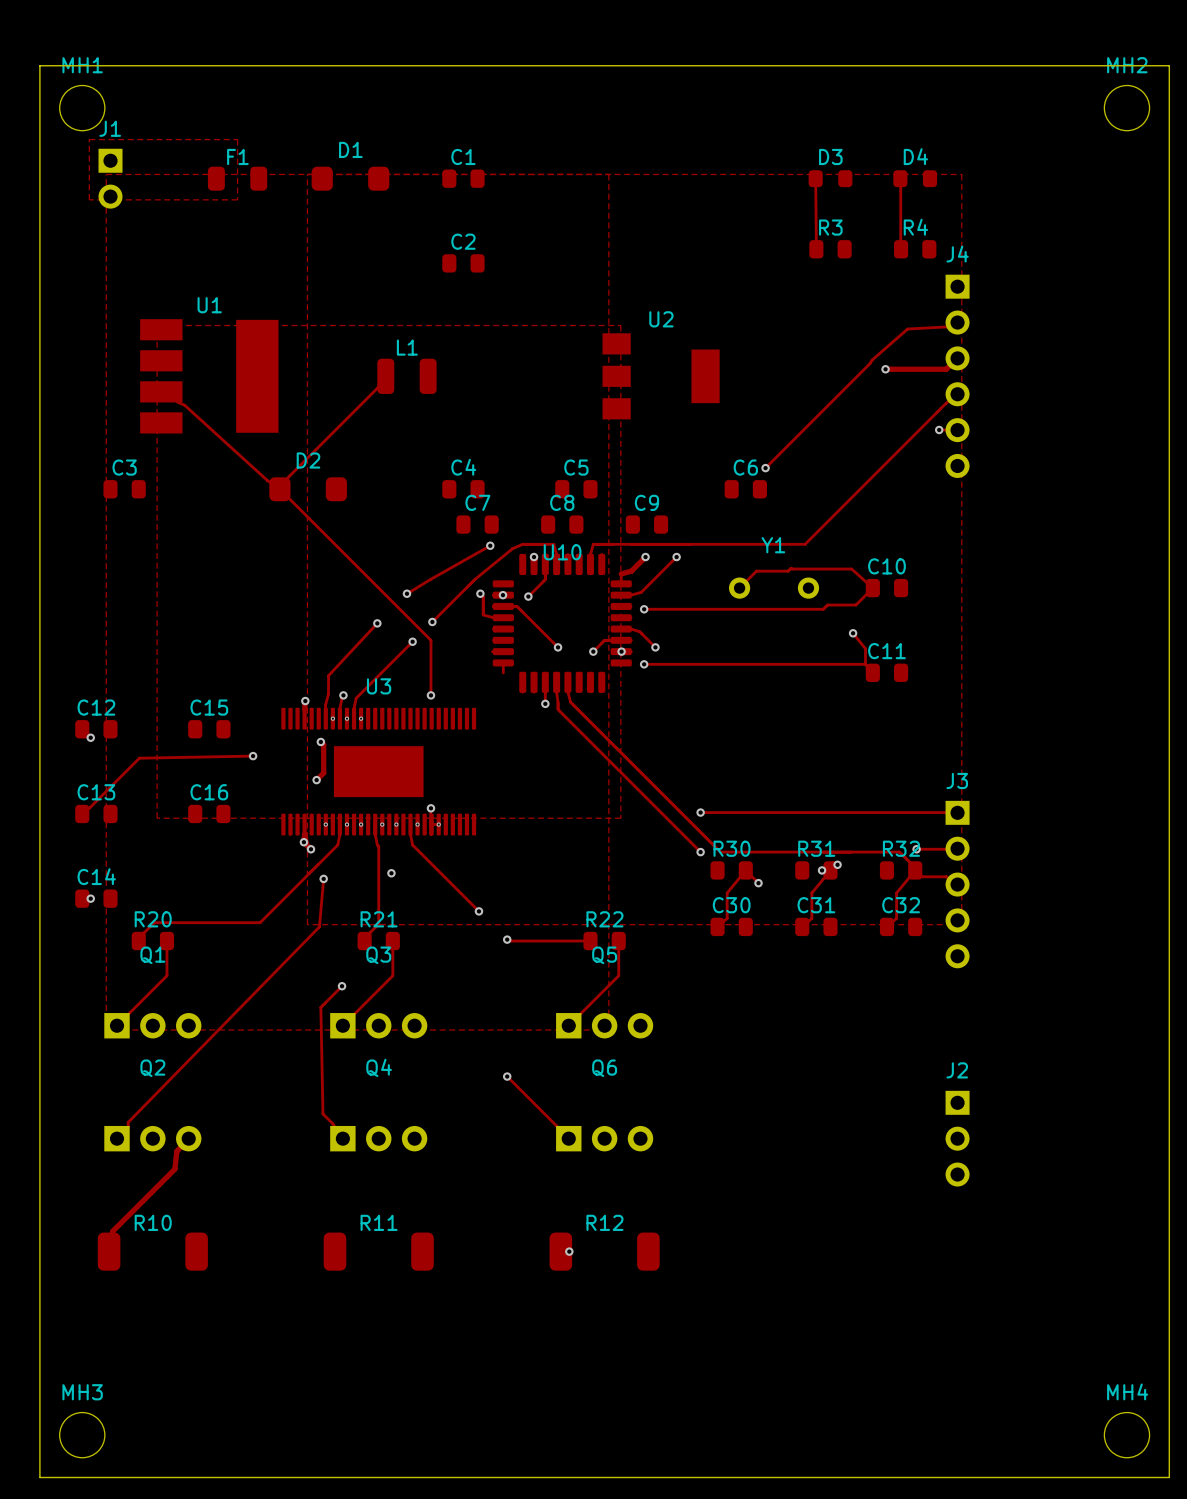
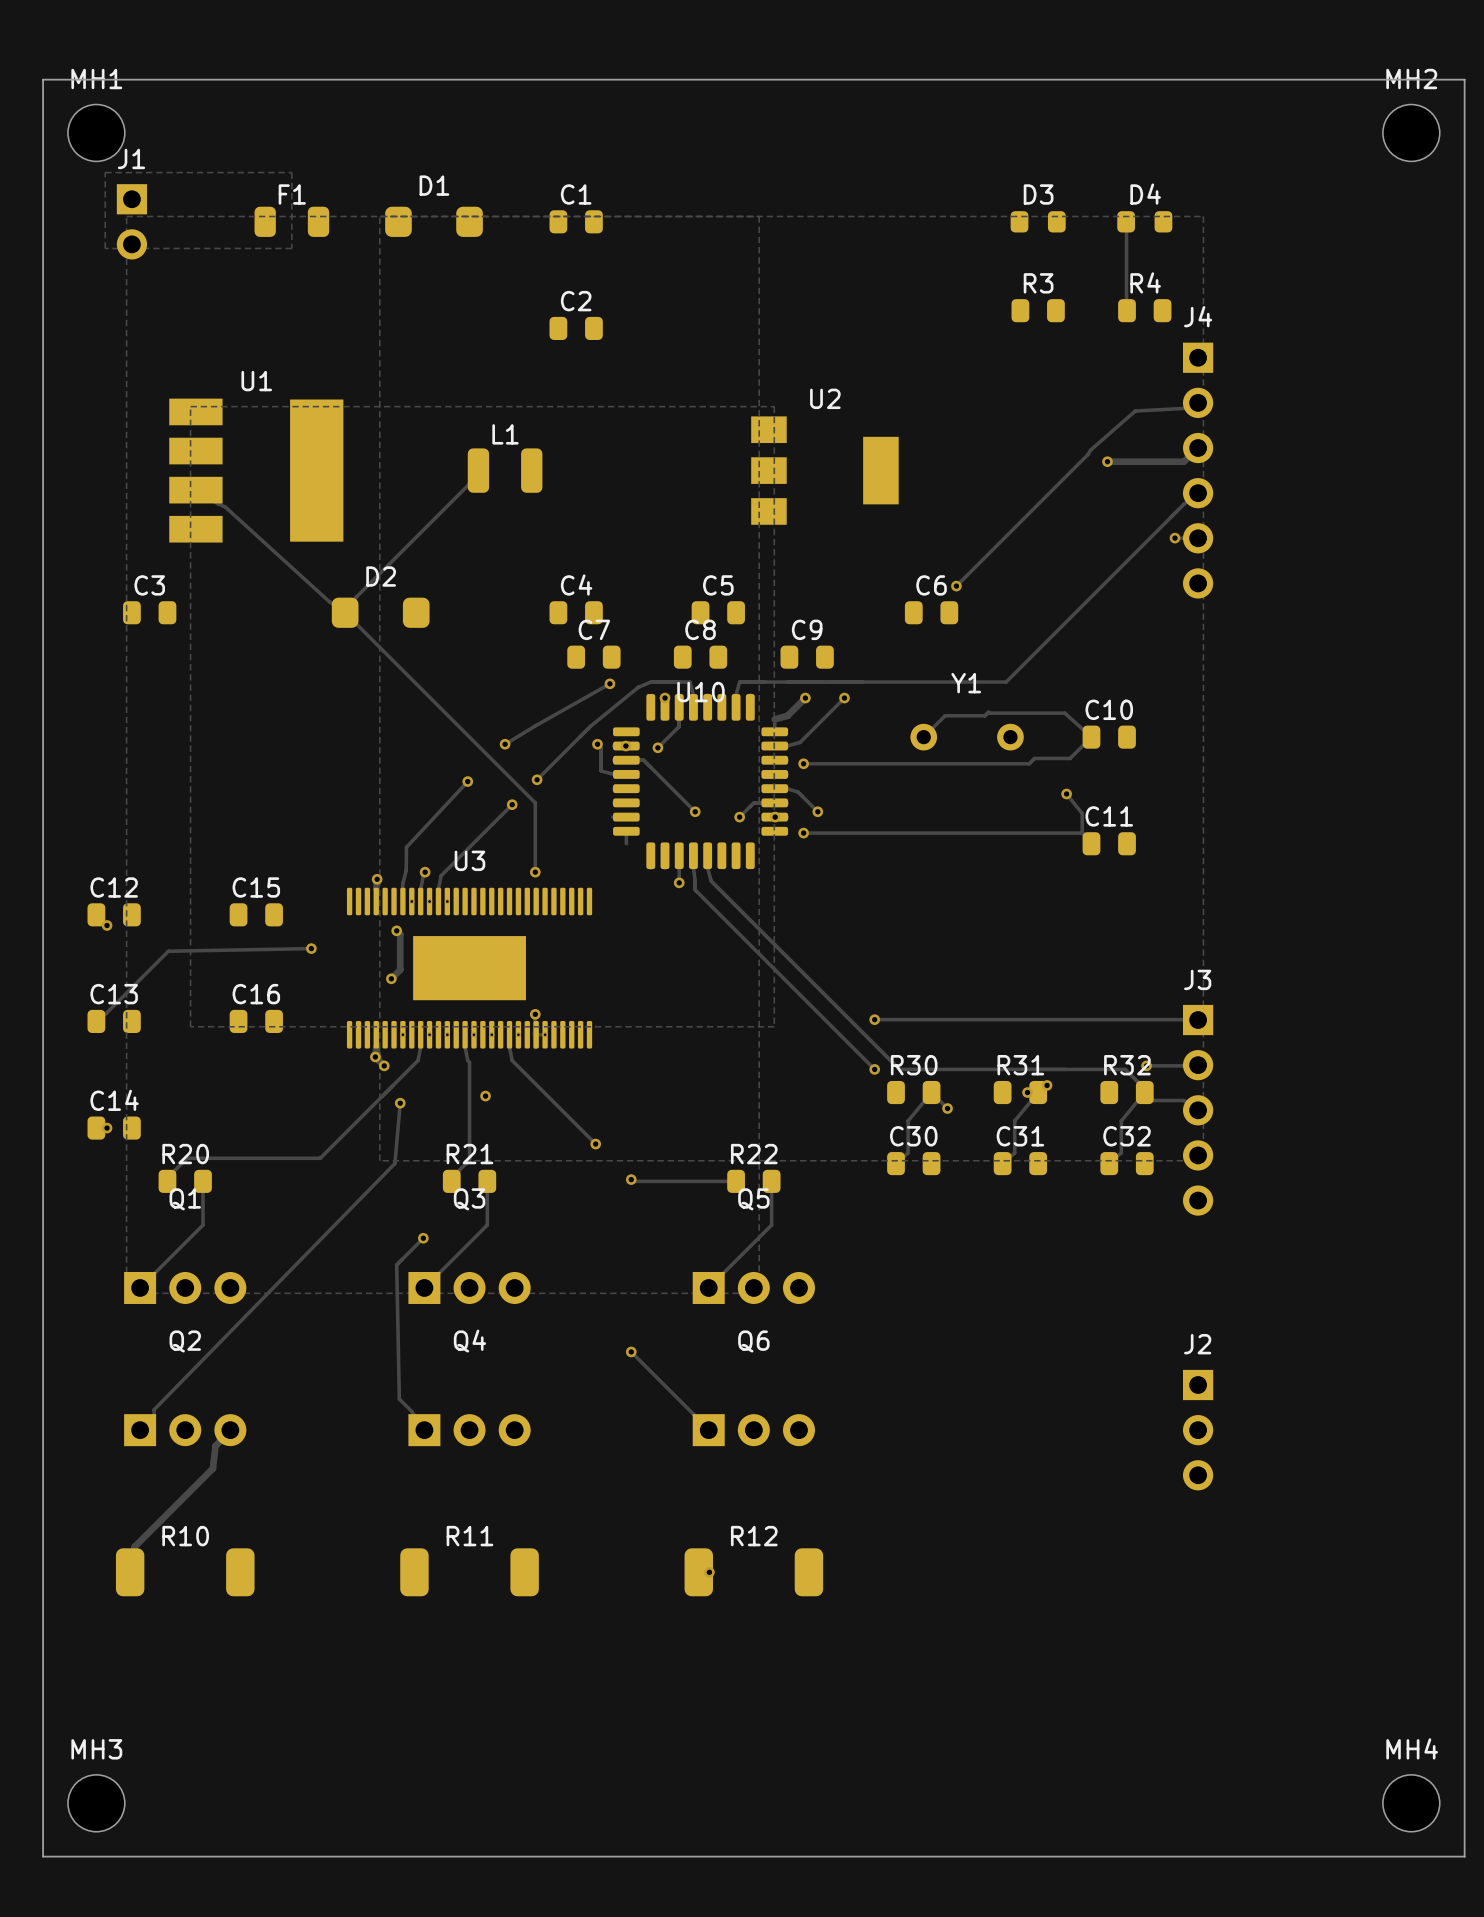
track: (815, 178) (816, 249) -> none

